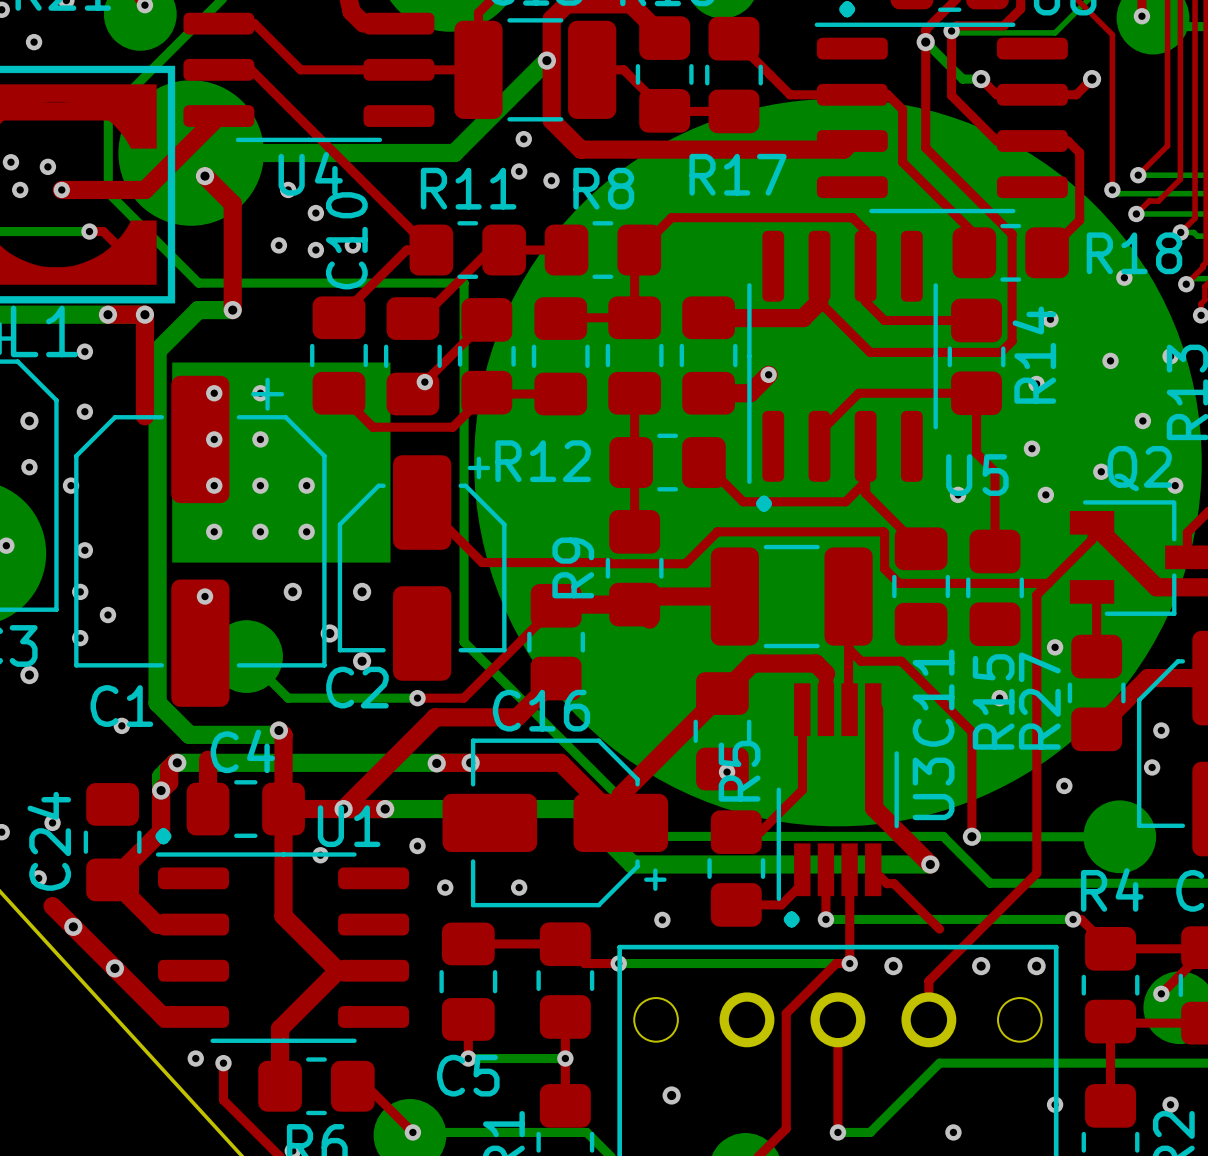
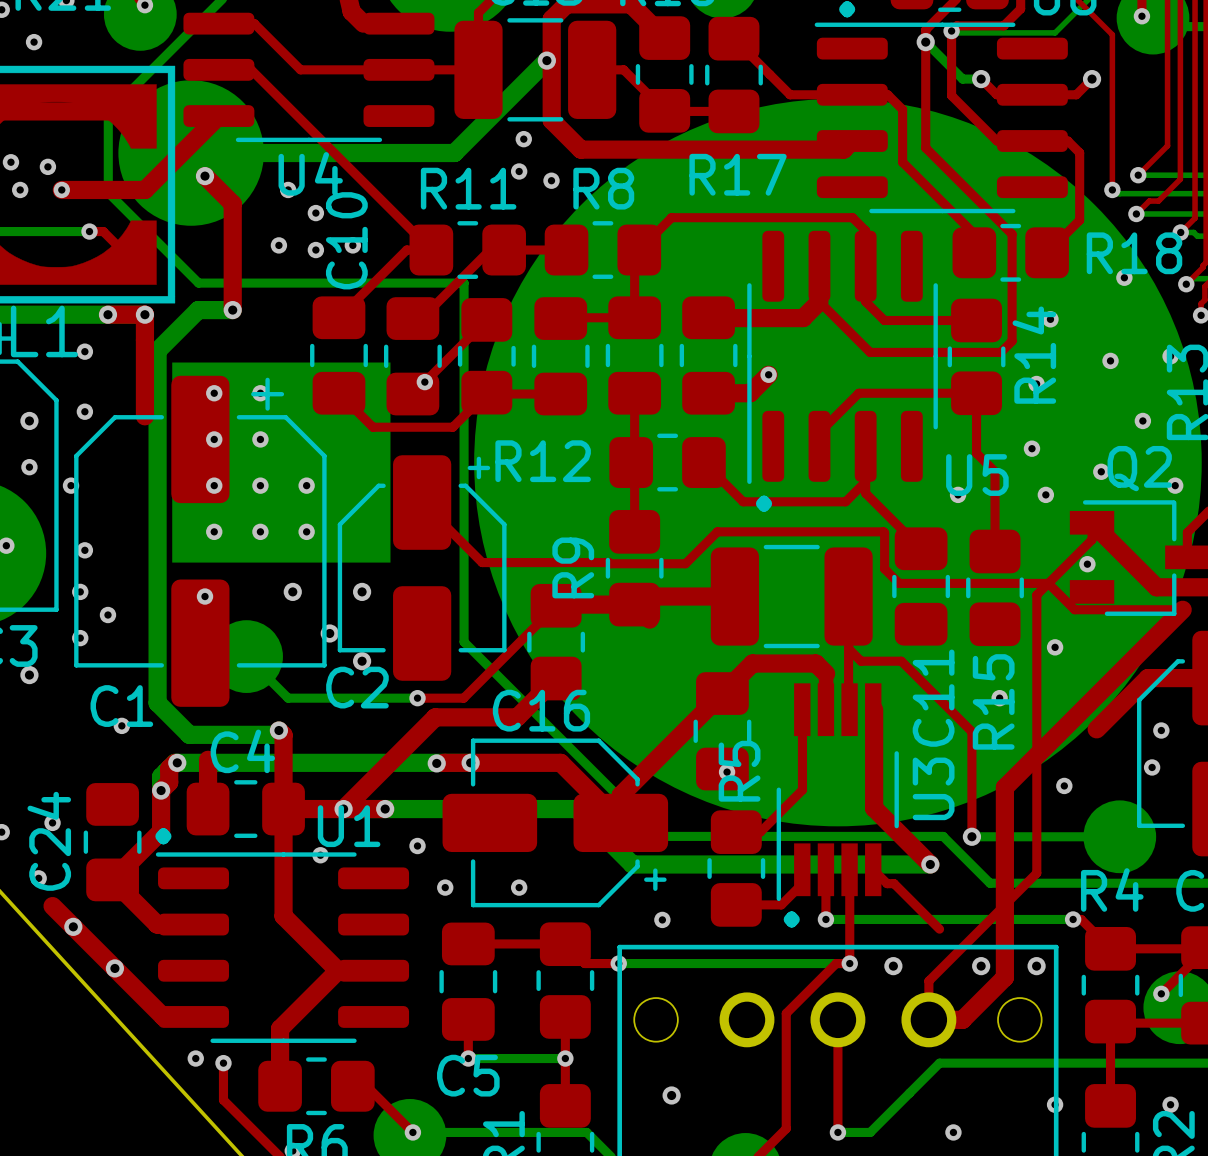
via: none -> (1087, 564)
top track: none -> (1048, 583) (1074, 609) (1182, 609) (1004, 787) (1004, 977) (962, 1019) (928, 1019)
top track: (1092, 591) (1096, 596) (1096, 656) -> none
R27: (1096, 692) -> none

